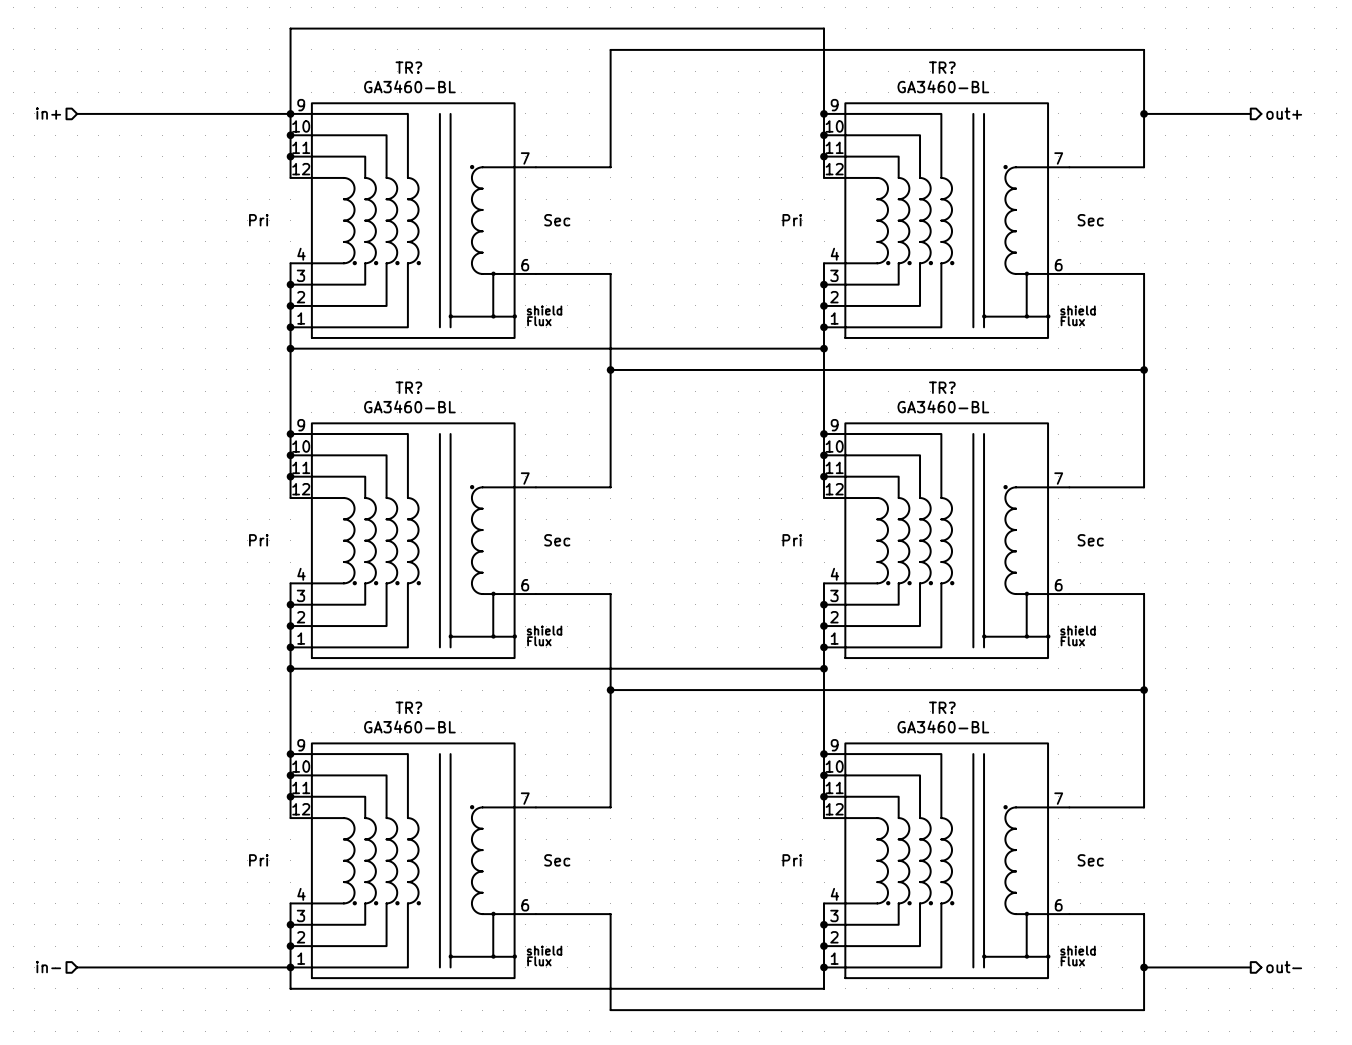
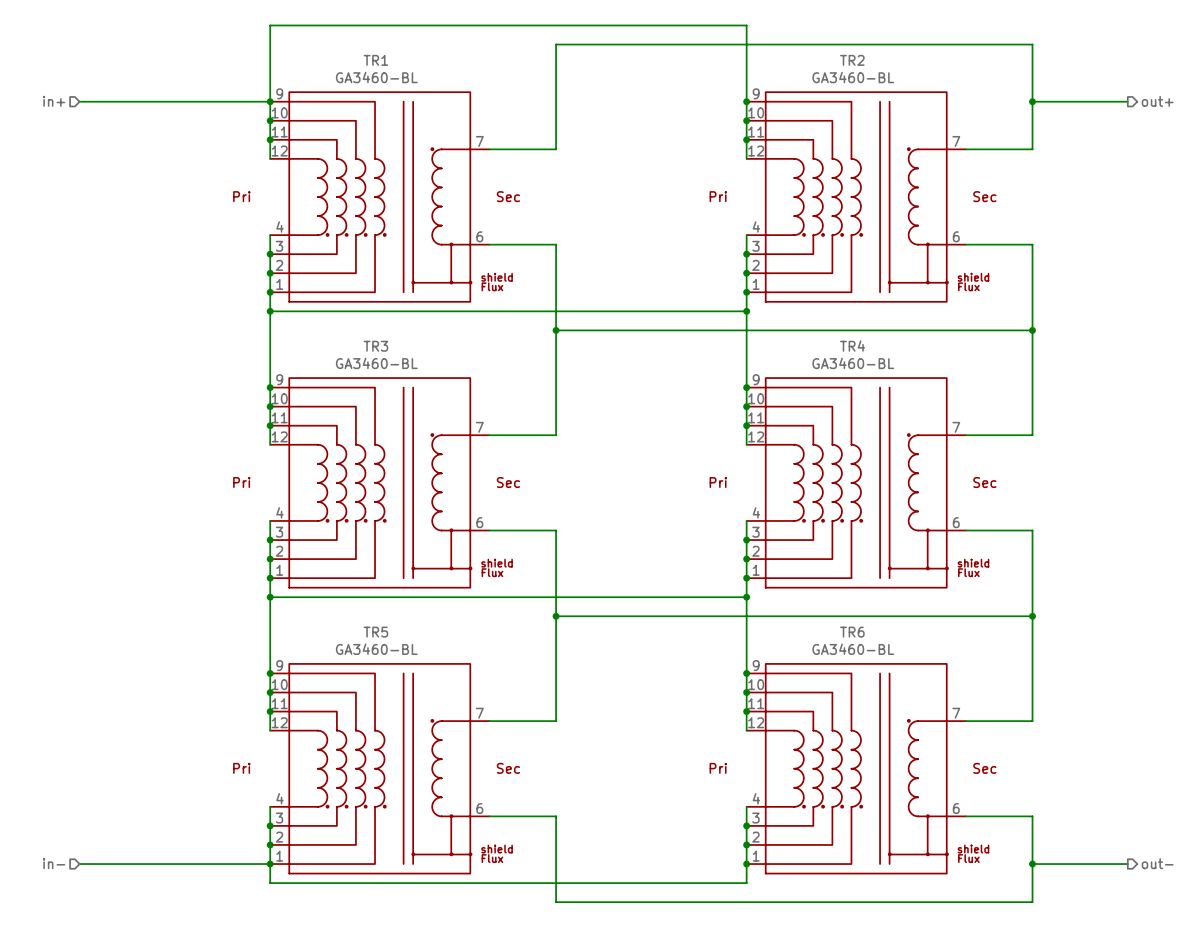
TR? name: TR? (408, 67) -> TR1 (375, 60)
TR? name: TR? (942, 67) -> TR2 (852, 60)
TR? name: TR? (408, 387) -> TR3 (375, 346)
TR? name: TR? (942, 387) -> TR4 (852, 346)
TR? name: TR? (408, 707) -> TR5 (375, 632)
TR? name: TR? (942, 707) -> TR6 (852, 632)

